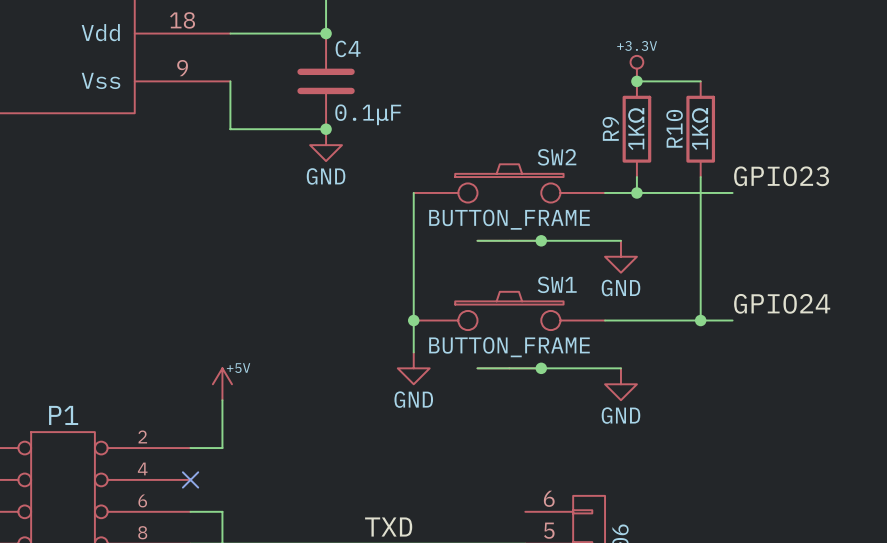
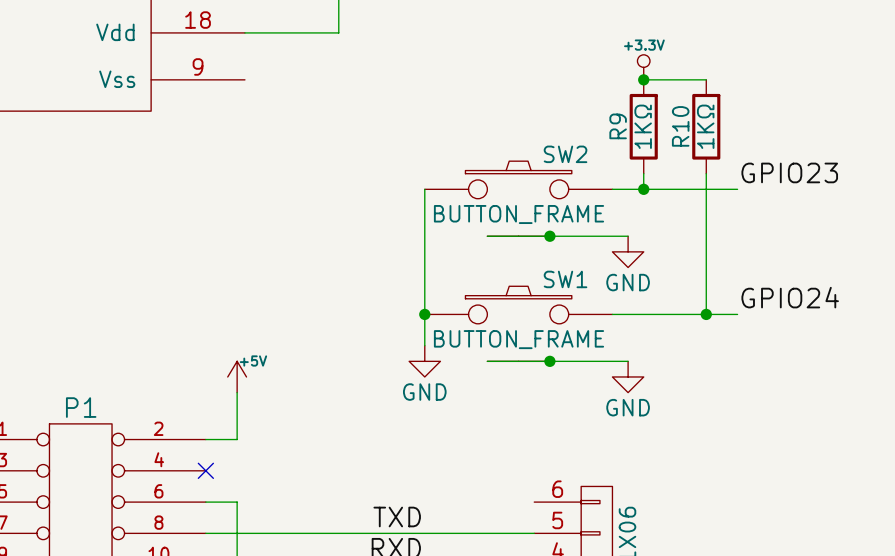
junction: (326, 33) -> none
wire: (230, 81) (230, 129) (326, 129) -> none
C4: 0.1μF (326, 81) -> none
junction: (326, 129) -> none
power symbol: GND (326, 145) -> none

